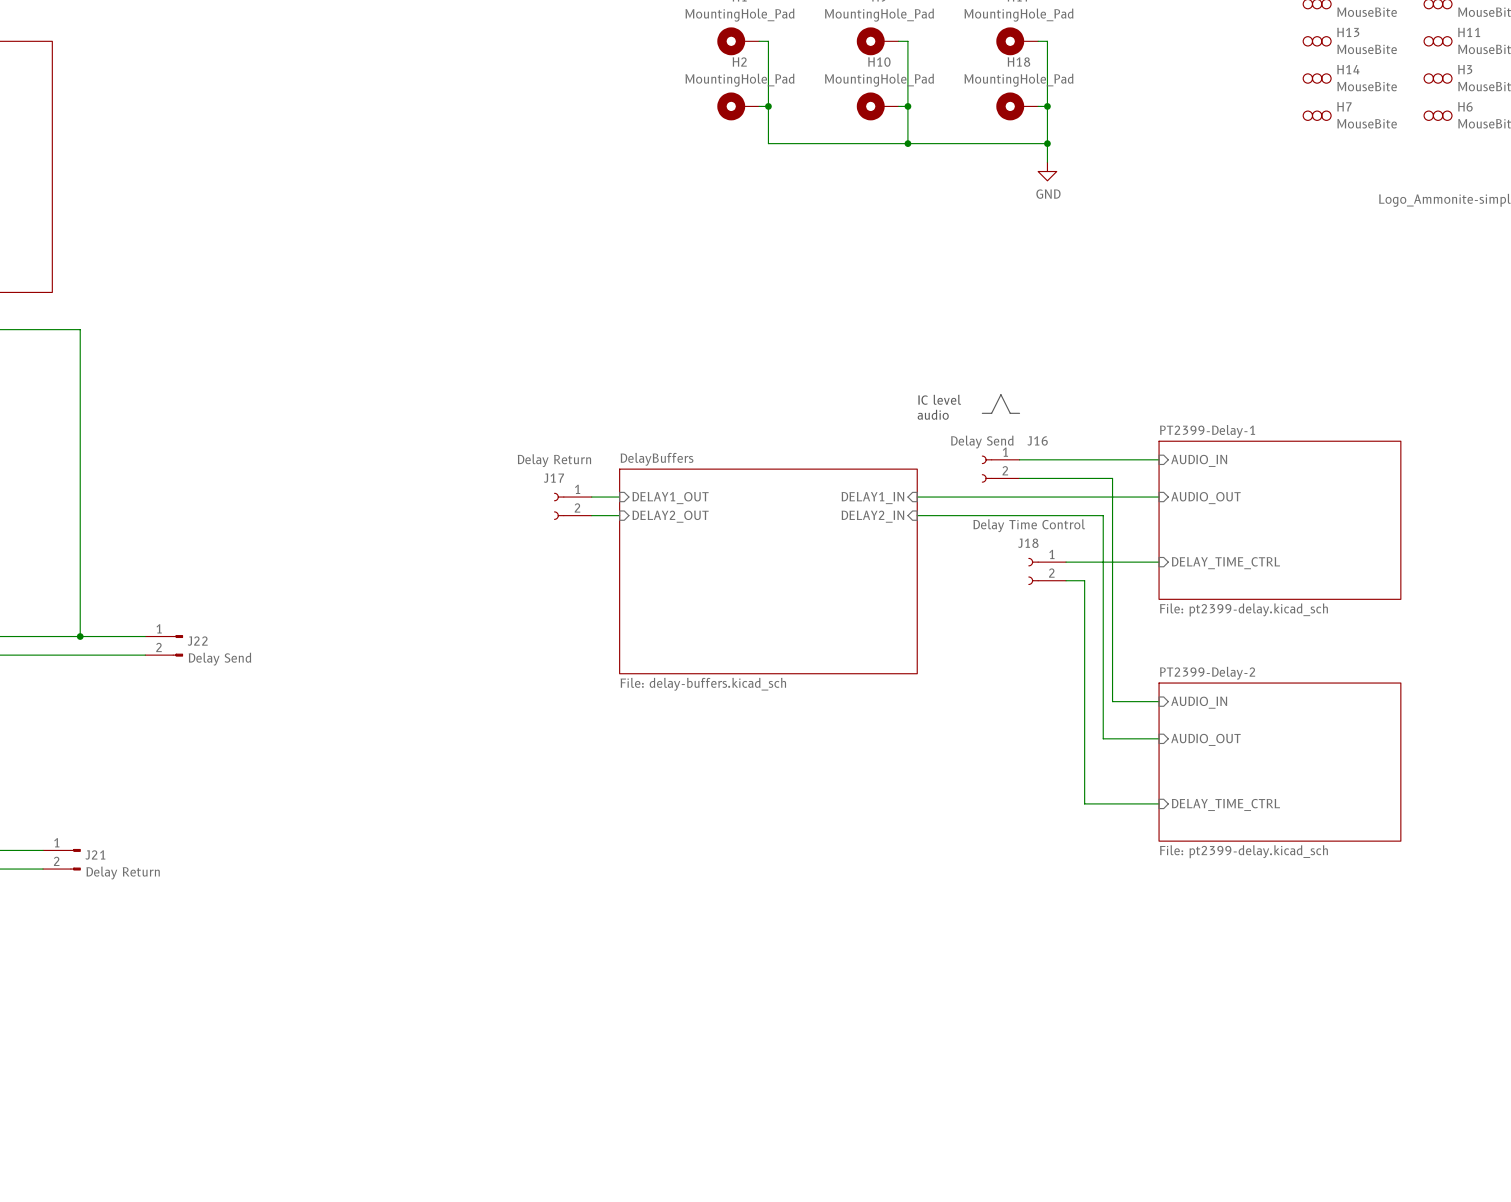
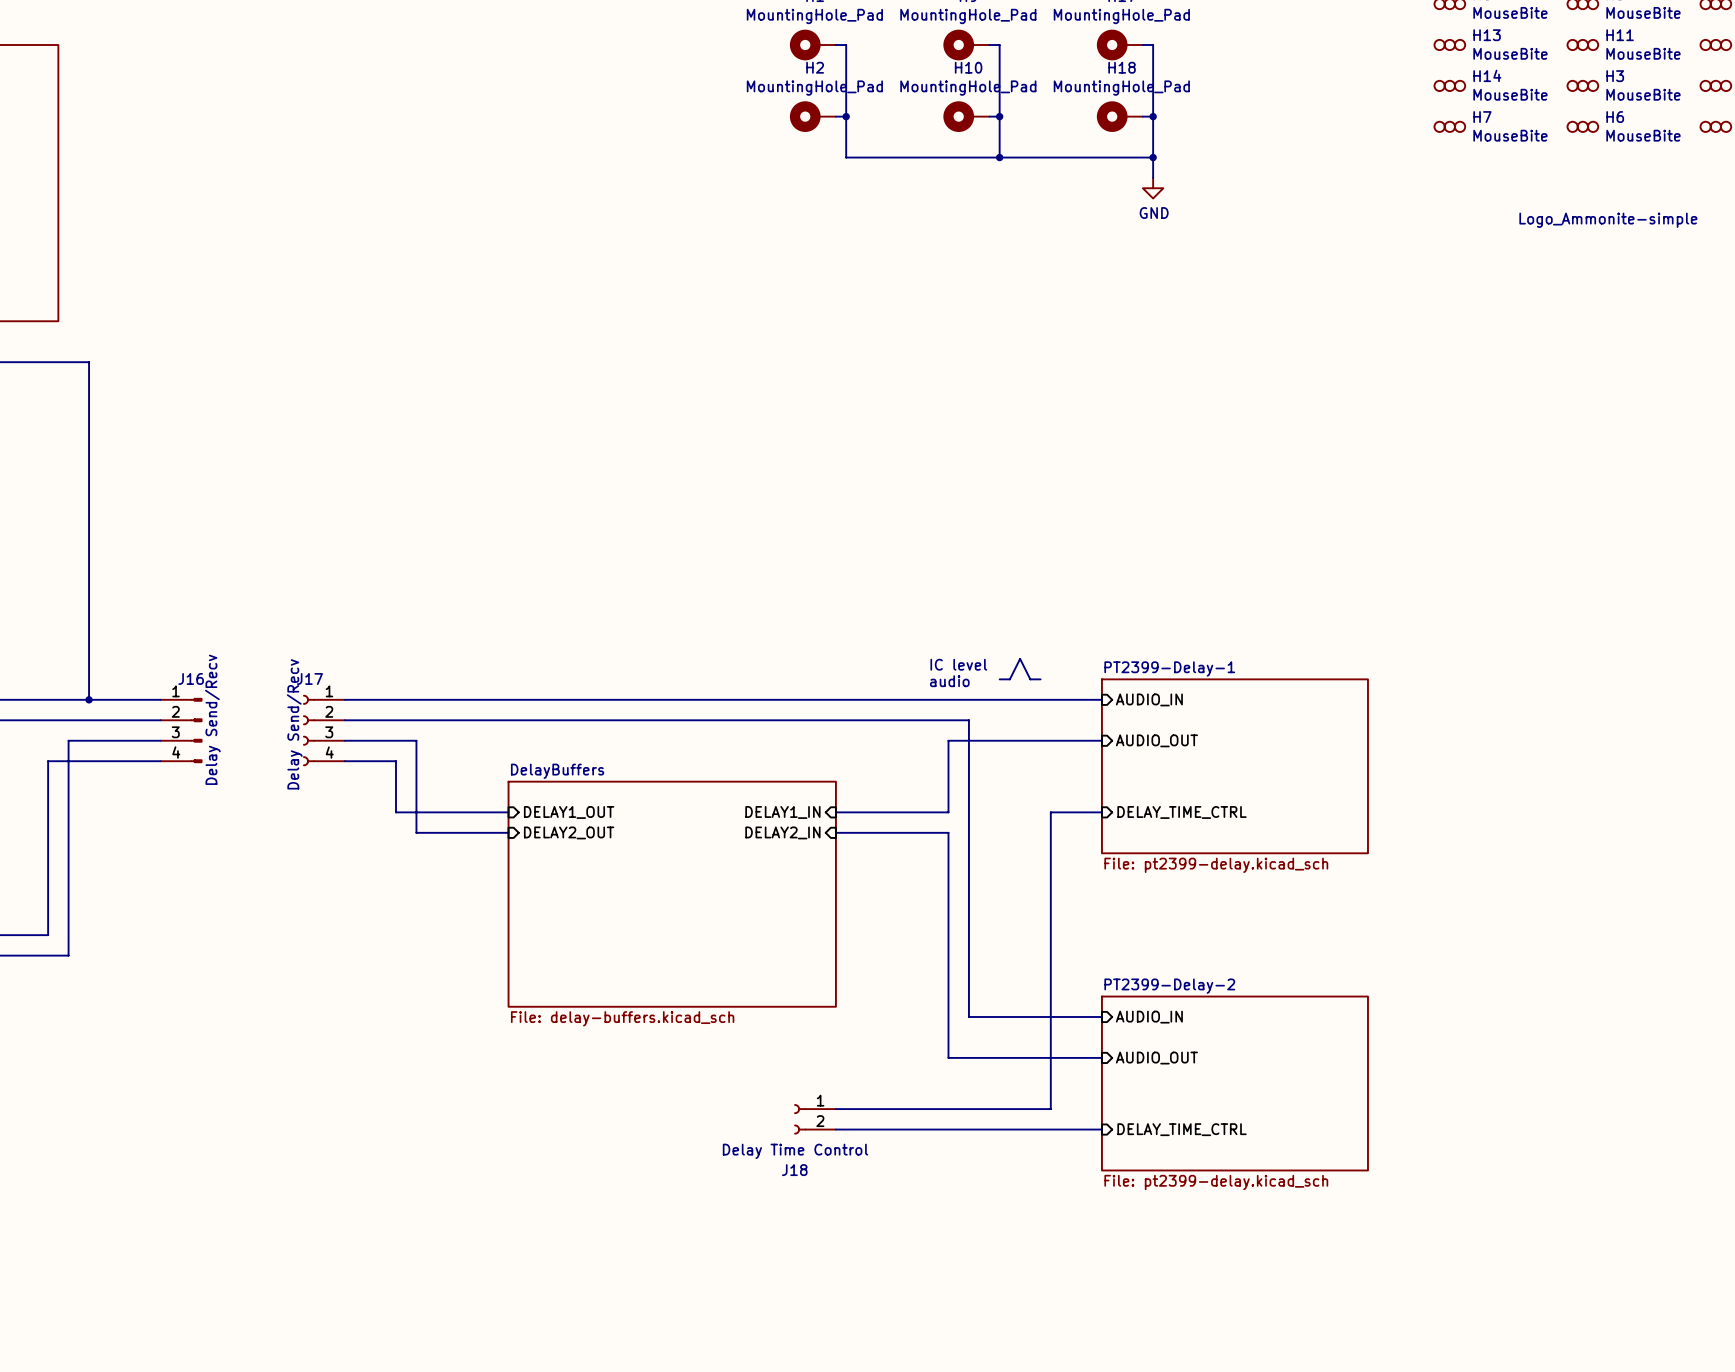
text: IC level (939, 399) -> none
line: (982, 413) (991, 413) (1000, 394) (1010, 413) (1019, 413) -> none
text: audio (933, 414) -> none
J16 name position: J16 (1037, 440) -> J16 (191, 678)
J16 value: Delay Send (982, 442) -> Delay Send/Recv (212, 719)
J16 symbol: [981, 455, 1020, 483] -> [160, 698, 203, 763]
wire: (1019, 459) (1159, 459) -> none
J17 value: Delay Return (554, 460) -> Delay Send/Recv (294, 724)
sheet pin: AUDIO_IN (1199, 460) -> none
J17 name position: J17 (553, 478) -> J17 (309, 678)
wire: (1019, 478) (1112, 478) (1112, 701) (1159, 701) -> none
J17 symbol: [553, 492, 592, 520] -> [303, 695, 345, 766]
wire: (591, 497) (619, 497) -> none
wire: (917, 497) (1159, 497) -> none
sheet pin: DELAY1_OUT (670, 498) -> none
sheet pin: DELAY1_IN (872, 498) -> none
sheet pin: AUDIO_OUT (1205, 498) -> none
wire: (591, 515) (619, 515) -> none
wire: (917, 515) (1103, 515) (1103, 738) (1159, 738) -> none
sheet pin: DELAY2_OUT (670, 516) -> none
sheet pin: DELAY2_IN (872, 516) -> none
sheet PT2399-Delay-1 position: (1279, 520) -> (1234, 766)
J18 value position: Delay Time Control (1029, 525) -> Delay Time Control (795, 1151)
J18 name position: J18 (1028, 543) -> J18 (794, 1170)
wire: (1066, 562) (1159, 562) -> none
sheet pin: DELAY_TIME_CTRL (1225, 563) -> none
sheet DelayBuffers: File: delay-buffers.kicad_sch (768, 571) -> none
J18 position: (1047, 571) -> (815, 1119)
wire: (1066, 580) (1084, 580) (1084, 803) (1159, 803) -> none
text: none -> IC level (958, 664)
line: none -> (999, 679) (1009, 679) (1020, 658) (1030, 679) (1040, 679)
text: none -> audio (949, 681)
wire: none -> (344, 699) (1101, 699)
sheet pin: none -> AUDIO_IN (1149, 699)
J22: Delay Send (164, 645) -> none
wire: none -> (344, 720) (968, 720) (968, 1017) (1101, 1017)
wire: none -> (160, 740) (68, 740) (68, 955) (48, 955)
wire: none -> (344, 740) (416, 740) (416, 832) (508, 832)
wire: none -> (1101, 740) (948, 740) (948, 812) (835, 812)
sheet pin: none -> AUDIO_OUT (1156, 740)
wire: none -> (160, 761) (48, 761) (48, 935)
wire: none -> (344, 761) (395, 761) (395, 812) (508, 812)
sheet pin: AUDIO_IN (1199, 702) -> none
wire: none -> (1101, 812) (1050, 812) (1050, 1109) (835, 1109)
sheet pin: none -> DELAY1_OUT (569, 812)
sheet pin: none -> DELAY1_IN (782, 812)
sheet pin: none -> DELAY_TIME_CTRL (1182, 812)
sheet pin: AUDIO_OUT (1205, 739) -> none
wire: none -> (835, 832) (948, 832) (948, 1057) (1101, 1057)
sheet pin: none -> DELAY2_OUT (569, 832)
sheet pin: none -> DELAY2_IN (782, 832)
sheet PT2399-Delay-2 position: (1279, 762) -> (1234, 1083)
sheet pin: DELAY_TIME_CTRL (1225, 804) -> none
sheet DelayBuffers: none -> File: delay-buffers.kicad_sch (672, 894)
J21: Delay Return (61, 859) -> none
sheet pin: none -> AUDIO_IN (1149, 1017)
sheet pin: none -> AUDIO_OUT (1156, 1058)
wire: none -> (835, 1129) (1101, 1129)
sheet pin: none -> DELAY_TIME_CTRL (1182, 1129)

